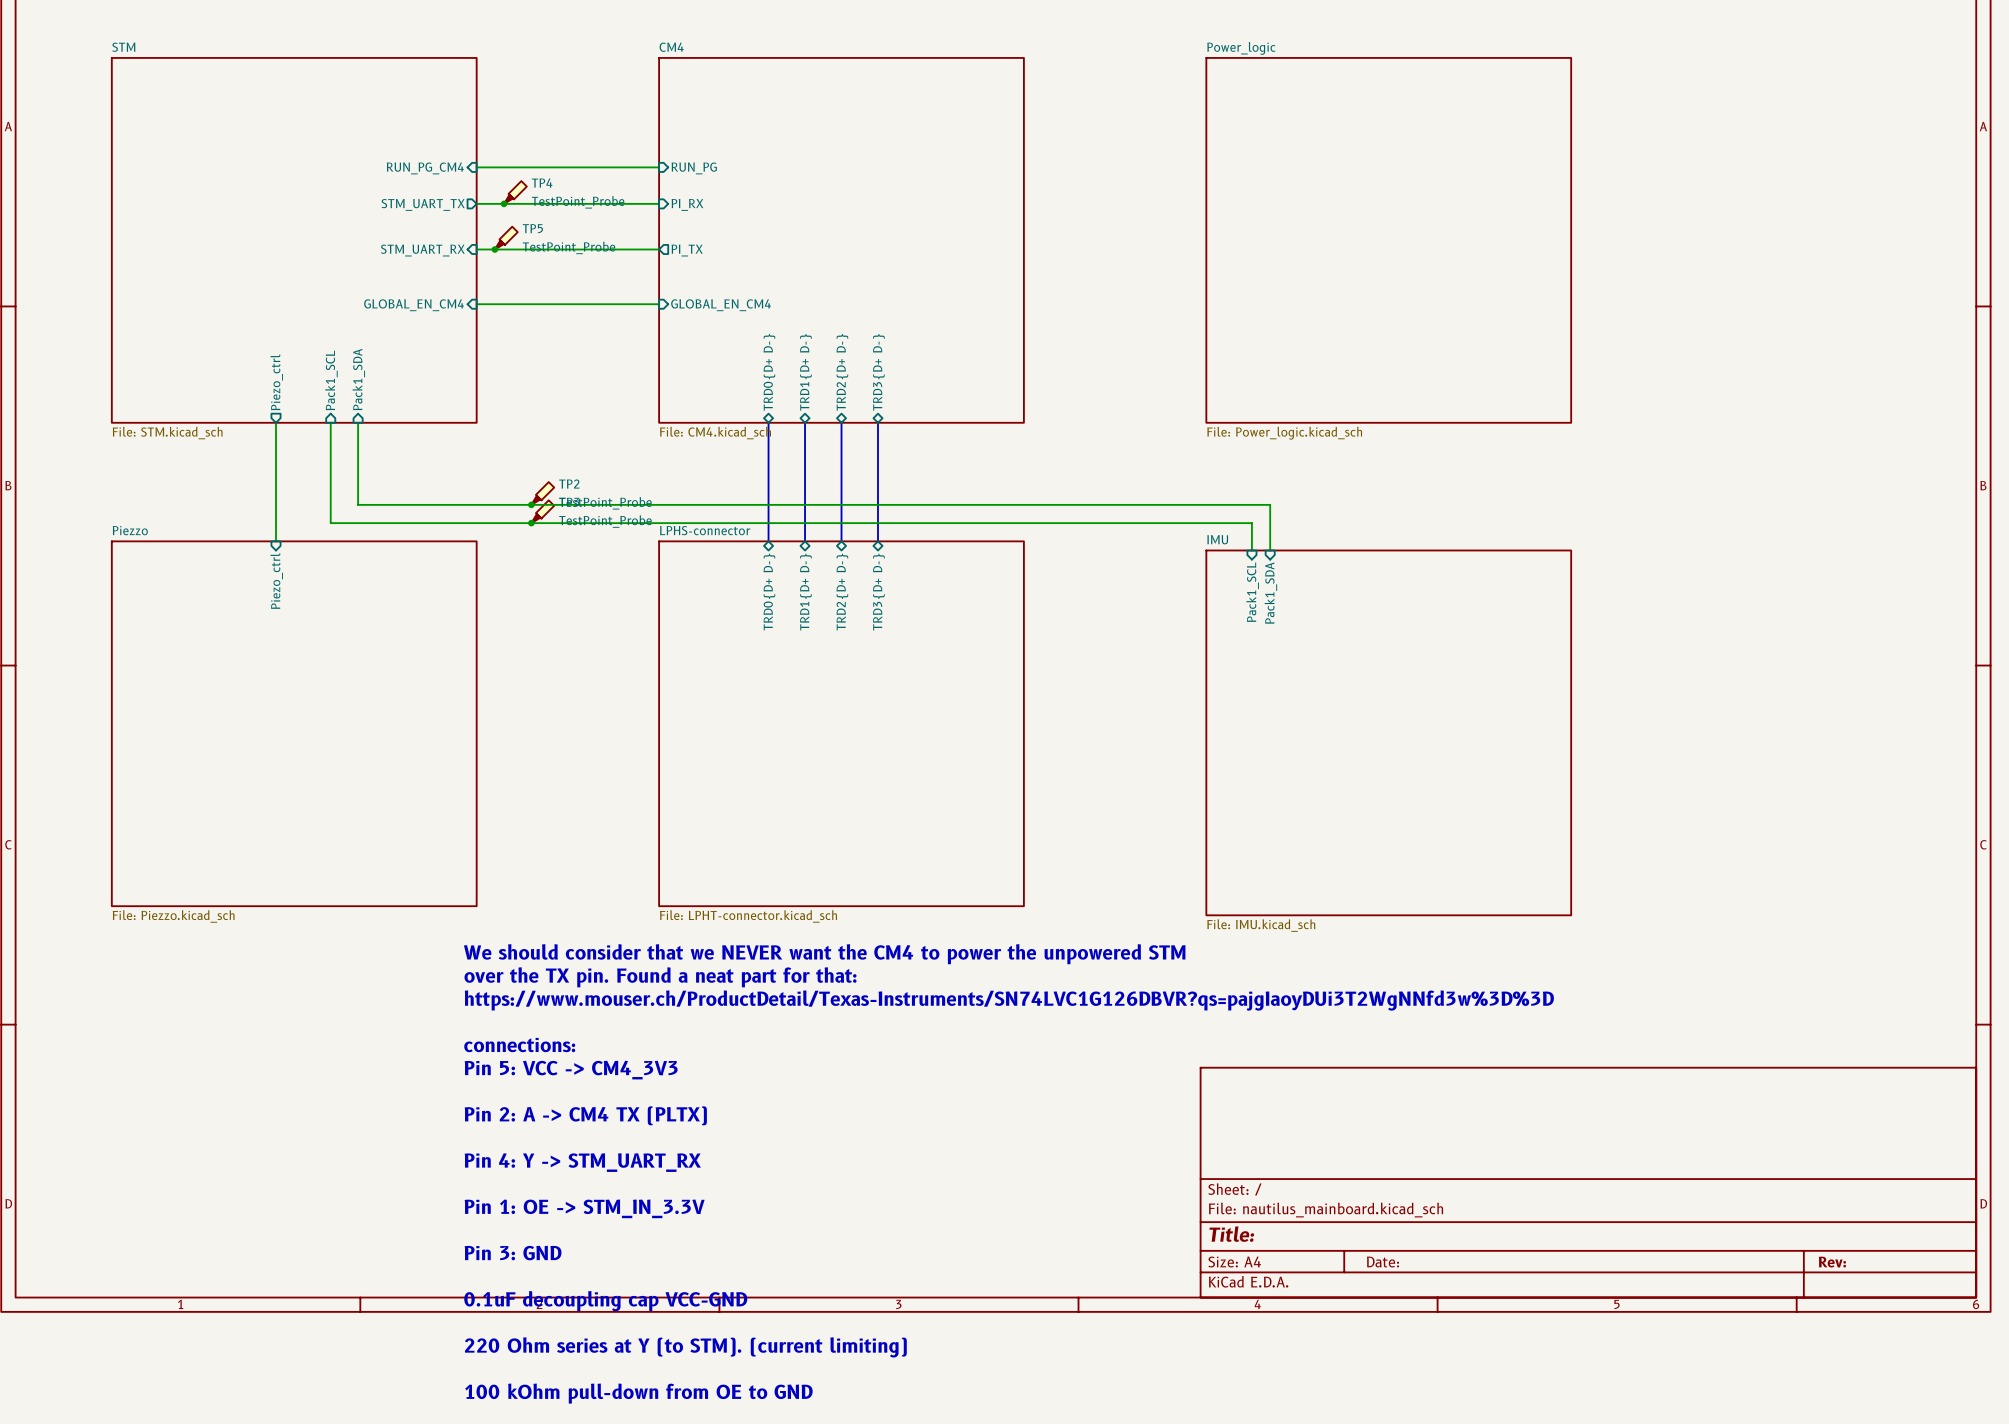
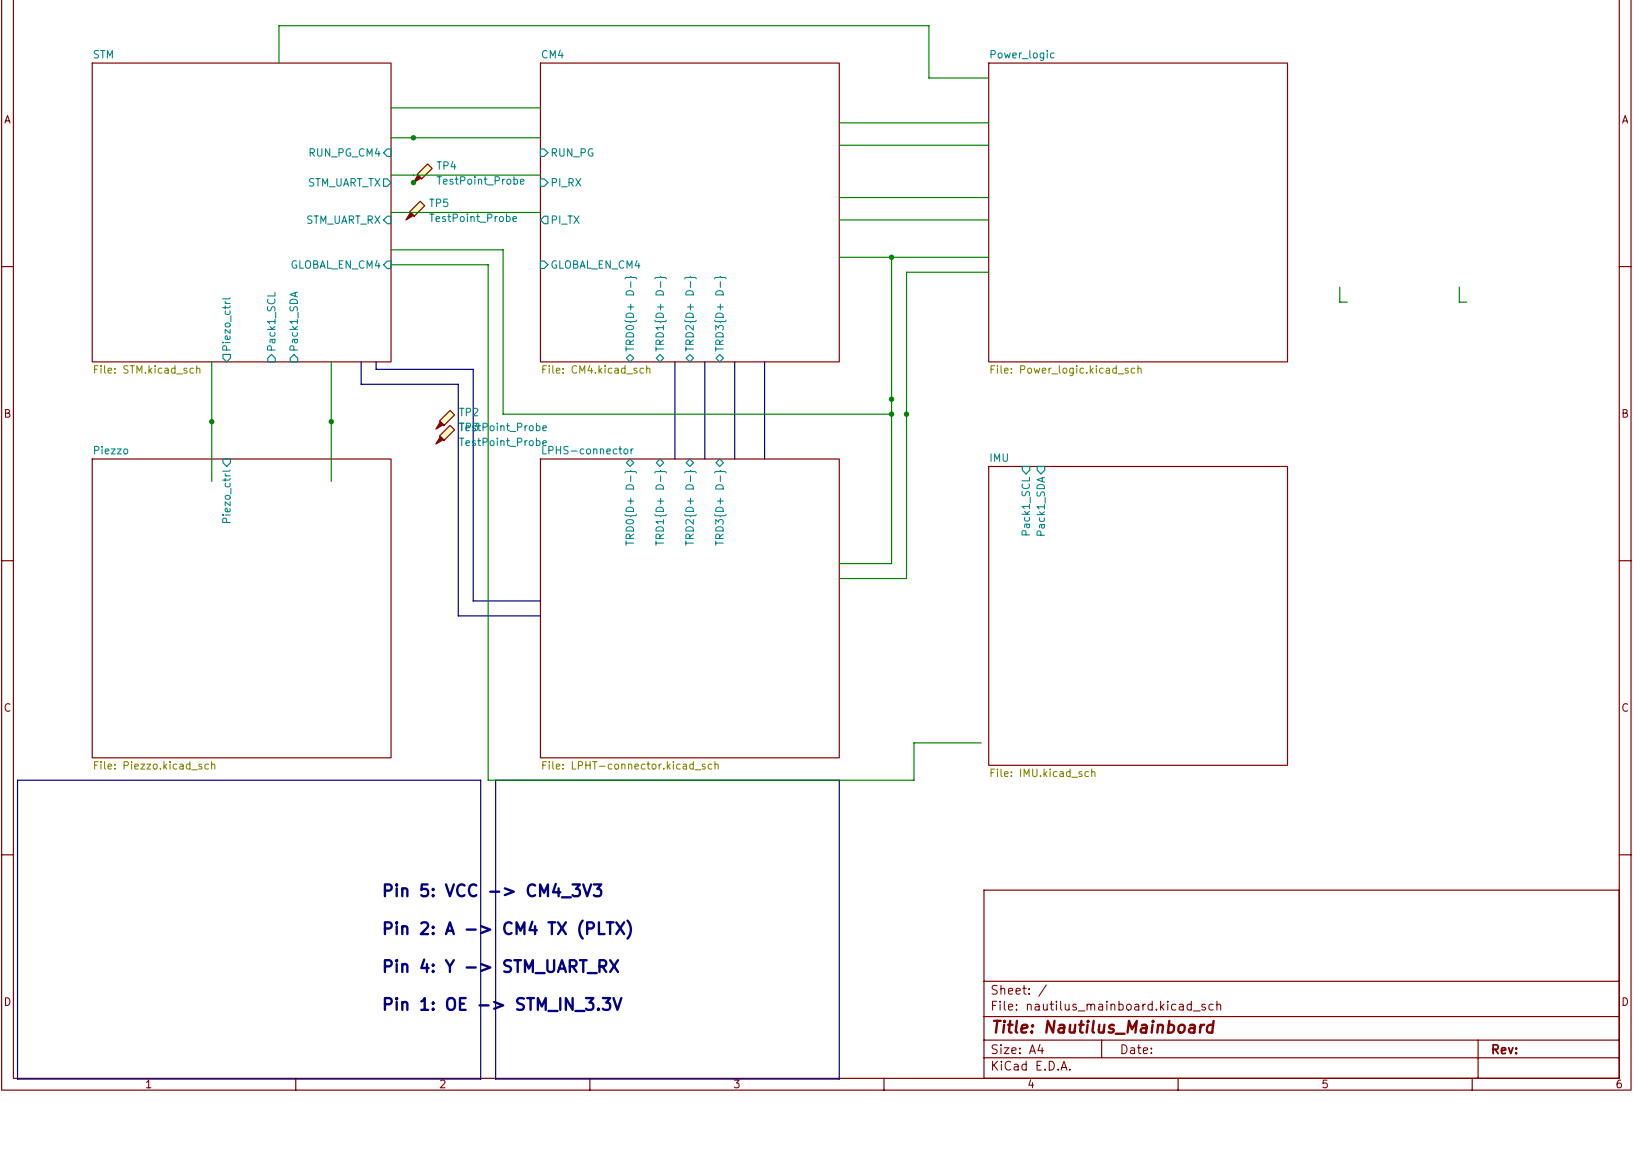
wire: none -> (278, 63) (278, 25) (928, 25) (928, 78) (988, 78)
wire: none -> (839, 122) (988, 122)
junction: none -> (413, 137)
wire: none -> (839, 145) (988, 145)
wire: (476, 167) (659, 167) -> (391, 107) (540, 107)
wire: (476, 203) (659, 203) -> (391, 137) (540, 137)
wire: none -> (839, 197) (988, 197)
wire: none -> (391, 212) (540, 212)
wire: (476, 249) (659, 249) -> (391, 175) (540, 175)
junction: (494, 249) -> none
wire: none -> (839, 219) (988, 219)
wire: none -> (391, 249) (503, 249) (503, 414) (891, 414)
wire: none -> (839, 257) (988, 257)
wire: none -> (891, 257) (891, 563) (839, 563)
junction: none -> (891, 257)
wire: (595, 304) (659, 304) -> (488, 264) (488, 780) (913, 780) (913, 742) (981, 742)
wire: none -> (988, 272) (906, 272) (906, 578) (839, 578)
wire: none -> (1339, 287) (1339, 302) (1347, 302)
wire: none -> (1459, 287) (1459, 302) (1466, 302)
wire: none -> (211, 361) (211, 481)
wire: (276, 422) (276, 541) -> none
wire: (330, 422) (330, 523) (1251, 523) (1251, 550) -> none
wire: (358, 422) (358, 504) (1270, 504) (1270, 550) -> none
wire: none -> (331, 361) (331, 481)
bus: none -> (361, 361) (361, 384) (458, 384) (458, 615) (540, 615)
bus: none -> (376, 361) (376, 369) (473, 369) (473, 600) (540, 600)
bus: (768, 422) (768, 541) -> (674, 361) (674, 459)
bus: (805, 422) (805, 541) -> (704, 361) (704, 459)
bus: (841, 422) (841, 541) -> (734, 361) (734, 459)
bus: (877, 422) (877, 541) -> (764, 361) (764, 459)
junction: none -> (891, 399)
junction: none -> (891, 414)
junction: none -> (906, 414)
junction: none -> (211, 421)
junction: none -> (331, 421)
junction: (531, 504) -> none
junction: (531, 523) -> none
line: none -> (17, 780) (480, 780) (480, 1079) (17, 1079) (17, 780)
line: none -> (495, 780) (839, 780) (839, 1079) (495, 1079) (495, 780)
text: We should consider that we NEVER want the CM4 to power the unpowered STM (824, 954) -> none
text: over the TX pin. Found a neat part for that: (660, 977) -> none
text: https://www.mouser.ch/ProductDetail/Texas-Instruments/SN74LVC1G126DBVR?qs=pajgIaoyDUi3T2WgNNfd3w%3D%3D (1009, 1000) -> none
text: connections: (519, 1045) -> none
title block: Title: (1231, 1234) -> Title: Nautilus_Mainboard (1103, 1027)
text: Pin 3: GND (513, 1253) -> none
text: 0.1uF decoupling cap VCC-GND (605, 1301) -> none
text: 220 Ohm series at Y (to STM). (current limiting) (685, 1347) -> none
text: 100 kOhm pull-down from OE to GND (638, 1393) -> none

